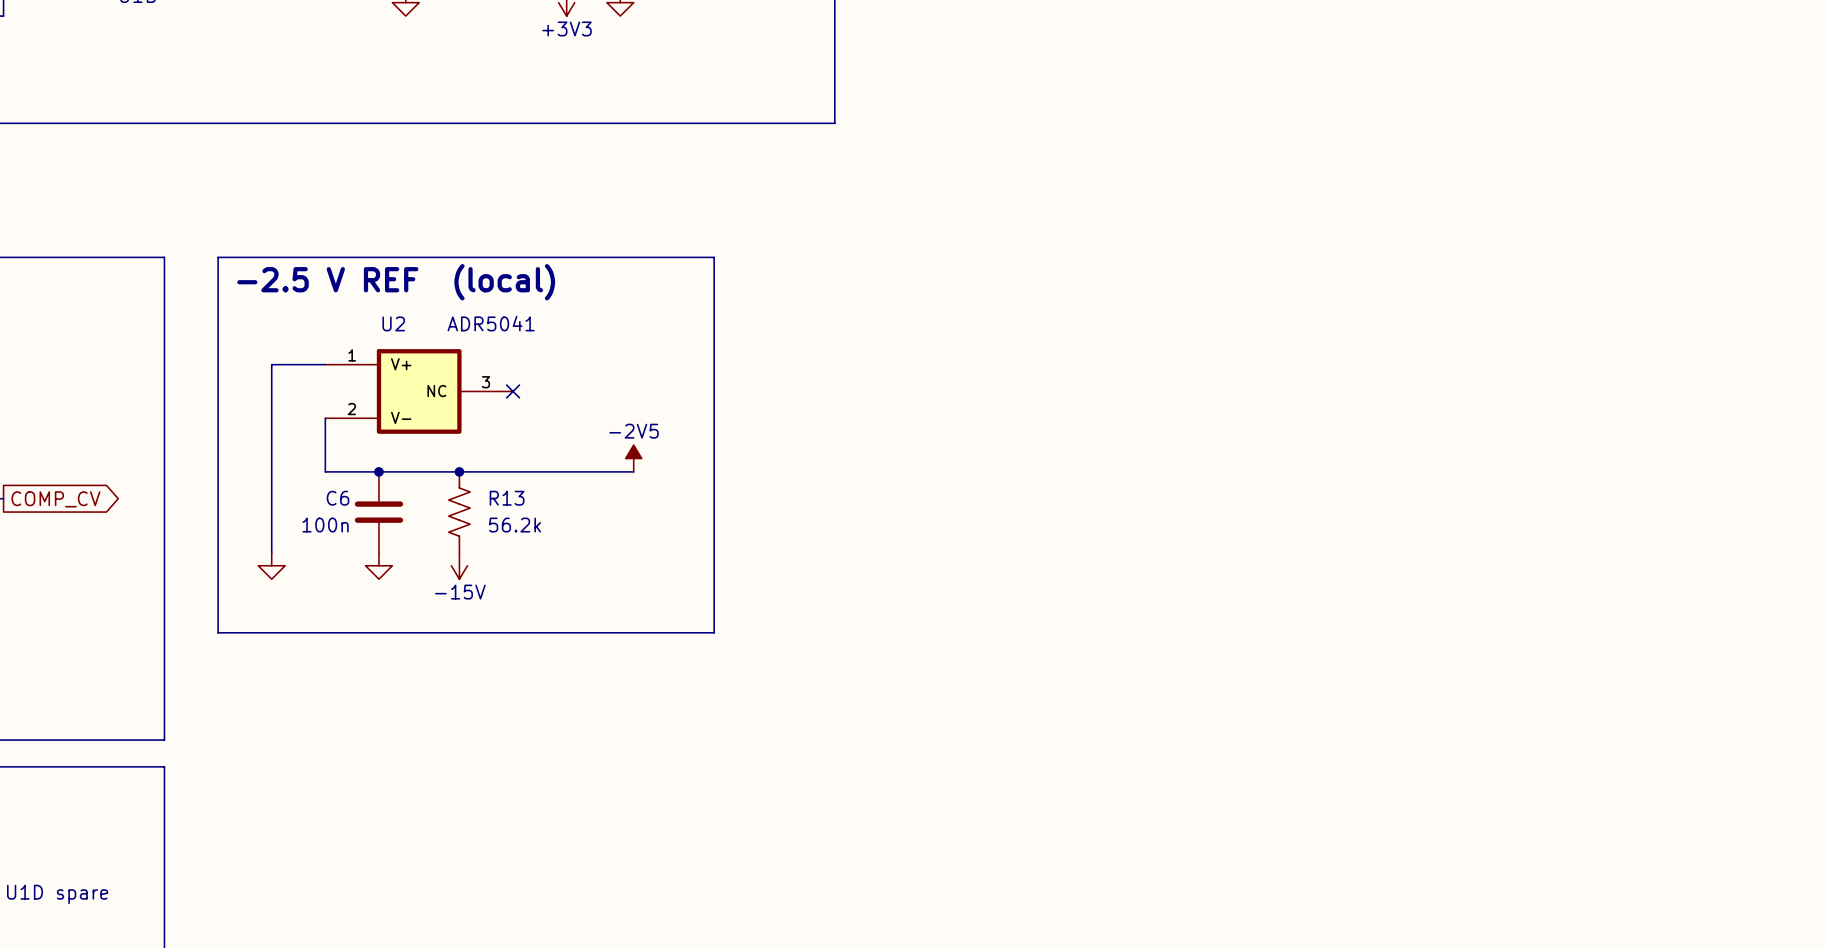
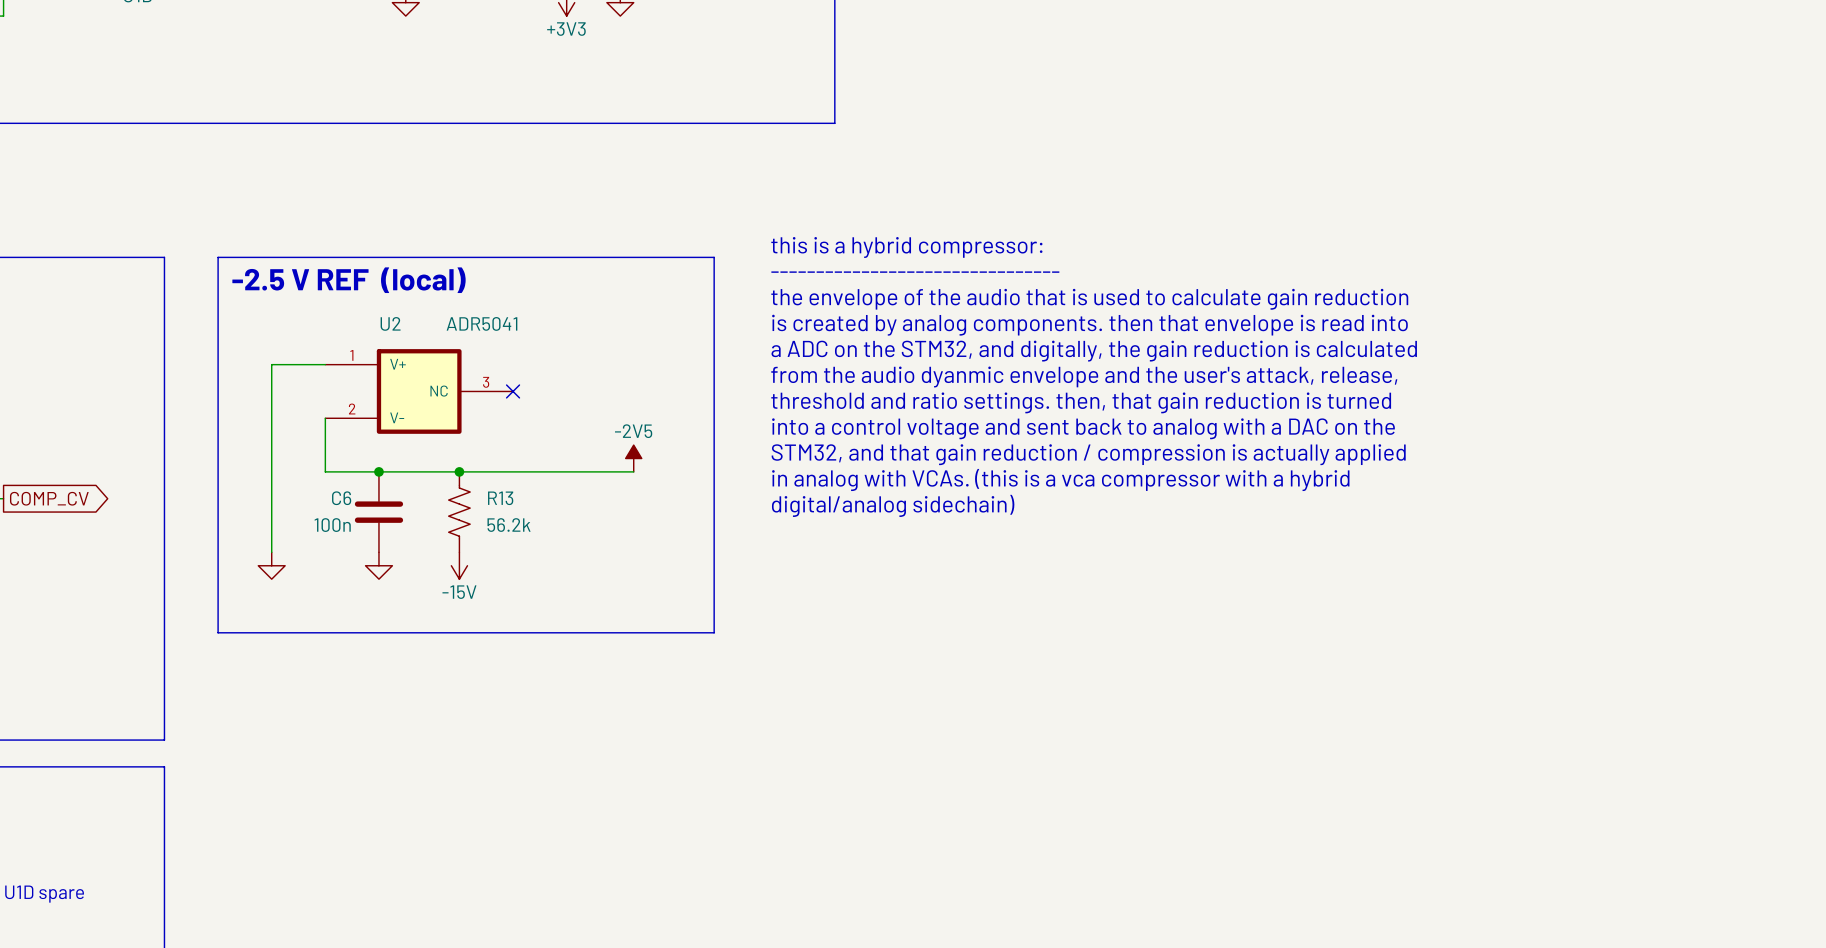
text: none -> this is a hybrid compressor: (906, 247)
text: none -> -------------------------------- (915, 272)
text: none -> the envelope of the audio that is used to calculate gain reduction (1089, 299)
text: none -> is created by analog components. then that envelope is read into (1089, 325)
text: none -> a ADC on the STM32, and digitally, the gain reduction is calculated (1094, 351)
text: none -> from the audio dyanmic envelope and the user's attack, release, (1084, 377)
text: none -> threshold and ratio settings. then, that gain reduction is turned (1081, 402)
text: none -> into a control voltage and sent back to analog with a DAC on the (1083, 428)
text: none -> STM32, and that gain reduction / compression is actually applied (1088, 454)
text: none -> in analog with VCAs. (this is a vca compressor with a hybrid (1060, 480)
text: none -> digital/analog sidechain) (893, 505)

